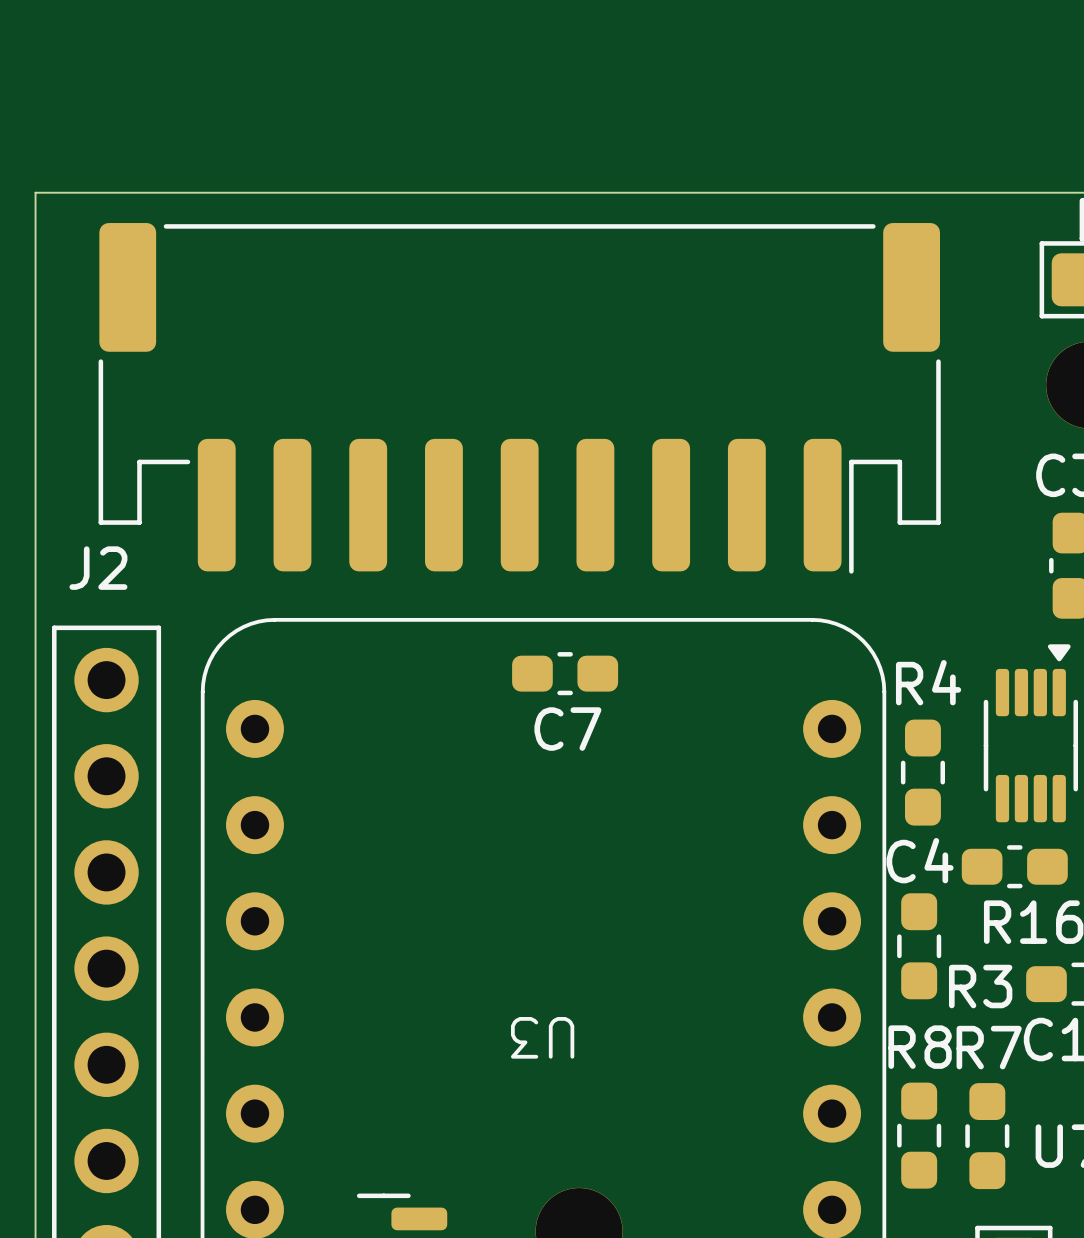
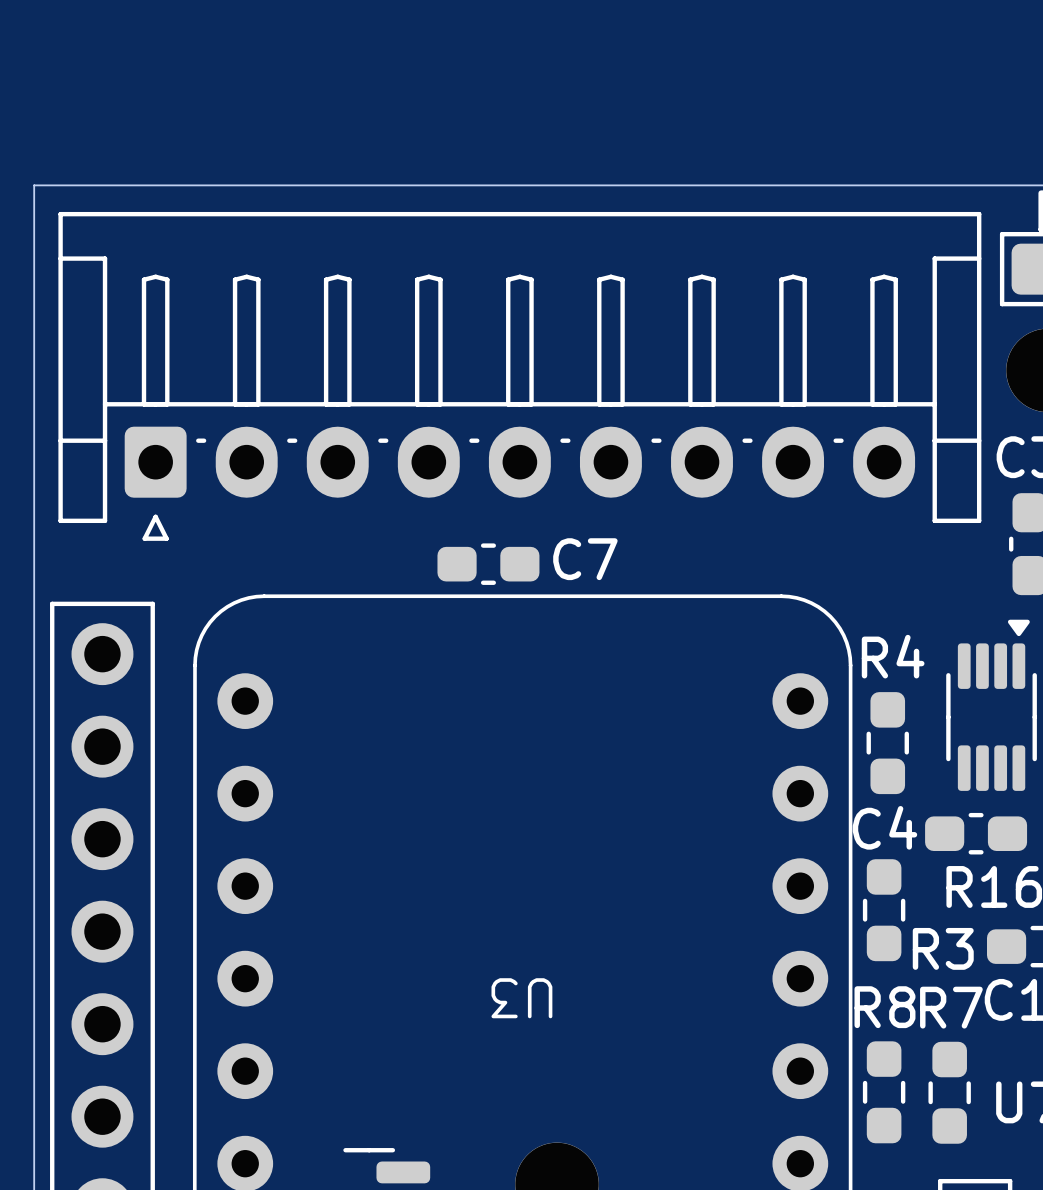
part: none -> (519, 376)
J2: (519, 398) -> none
C7 position: (565, 673) -> (488, 564)
C7 name position: C7 (567, 729) -> C7 (585, 559)

